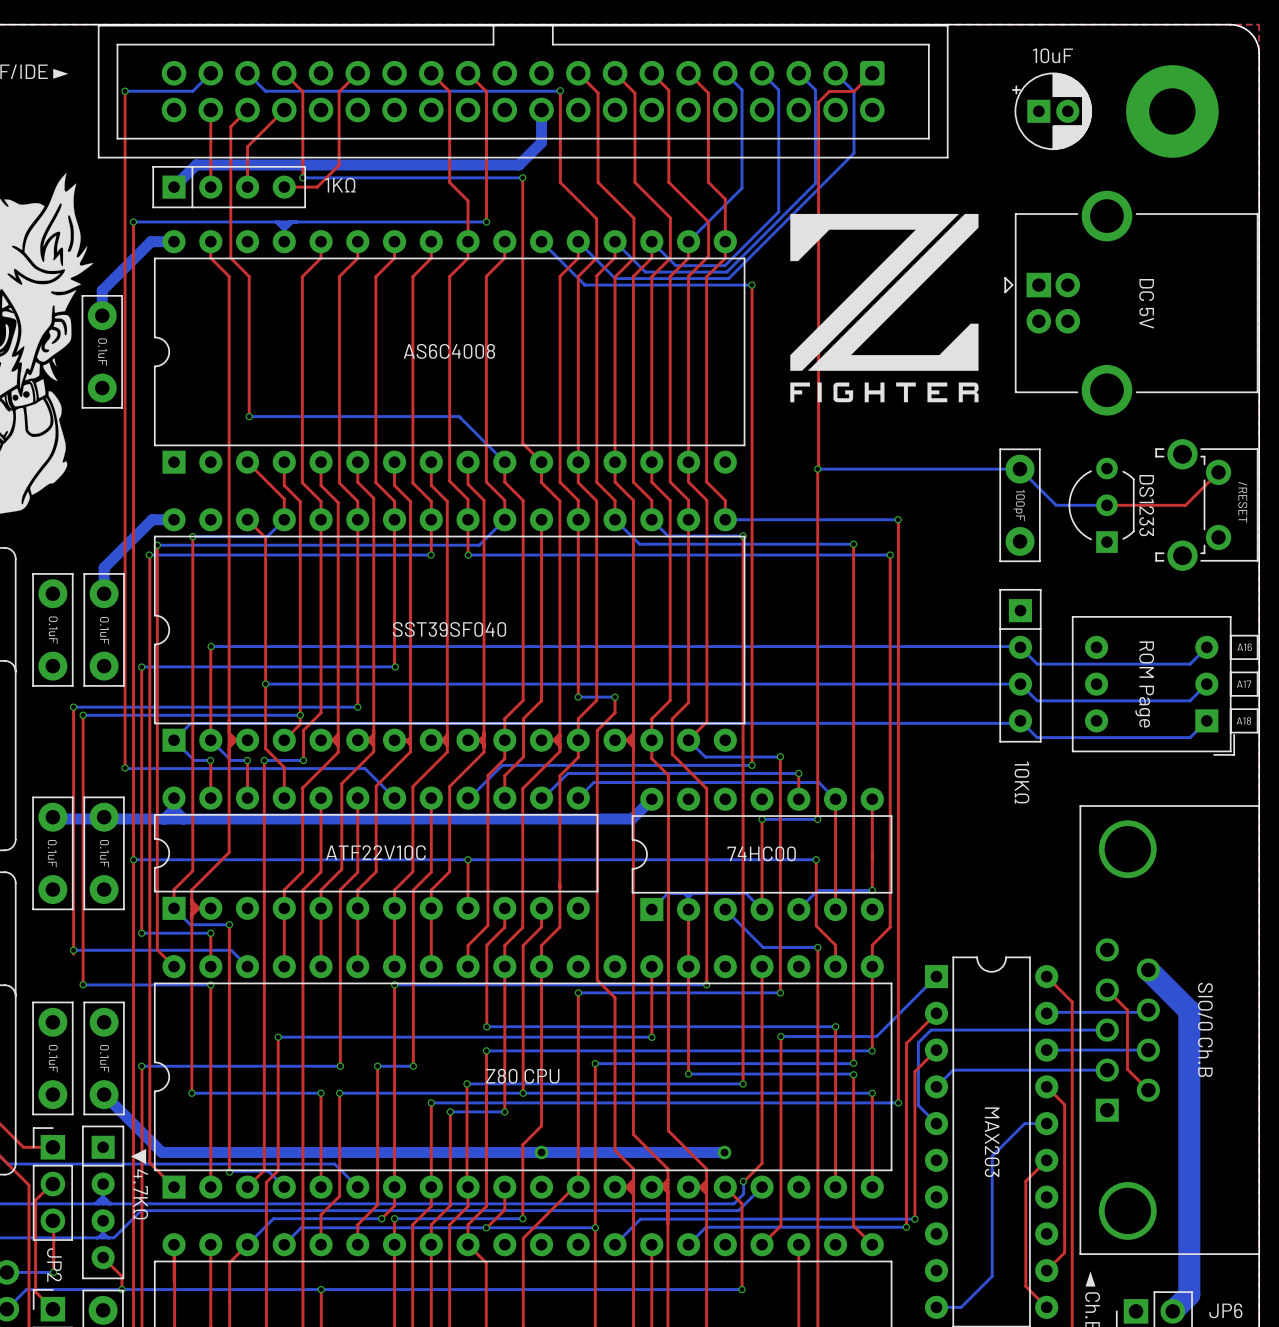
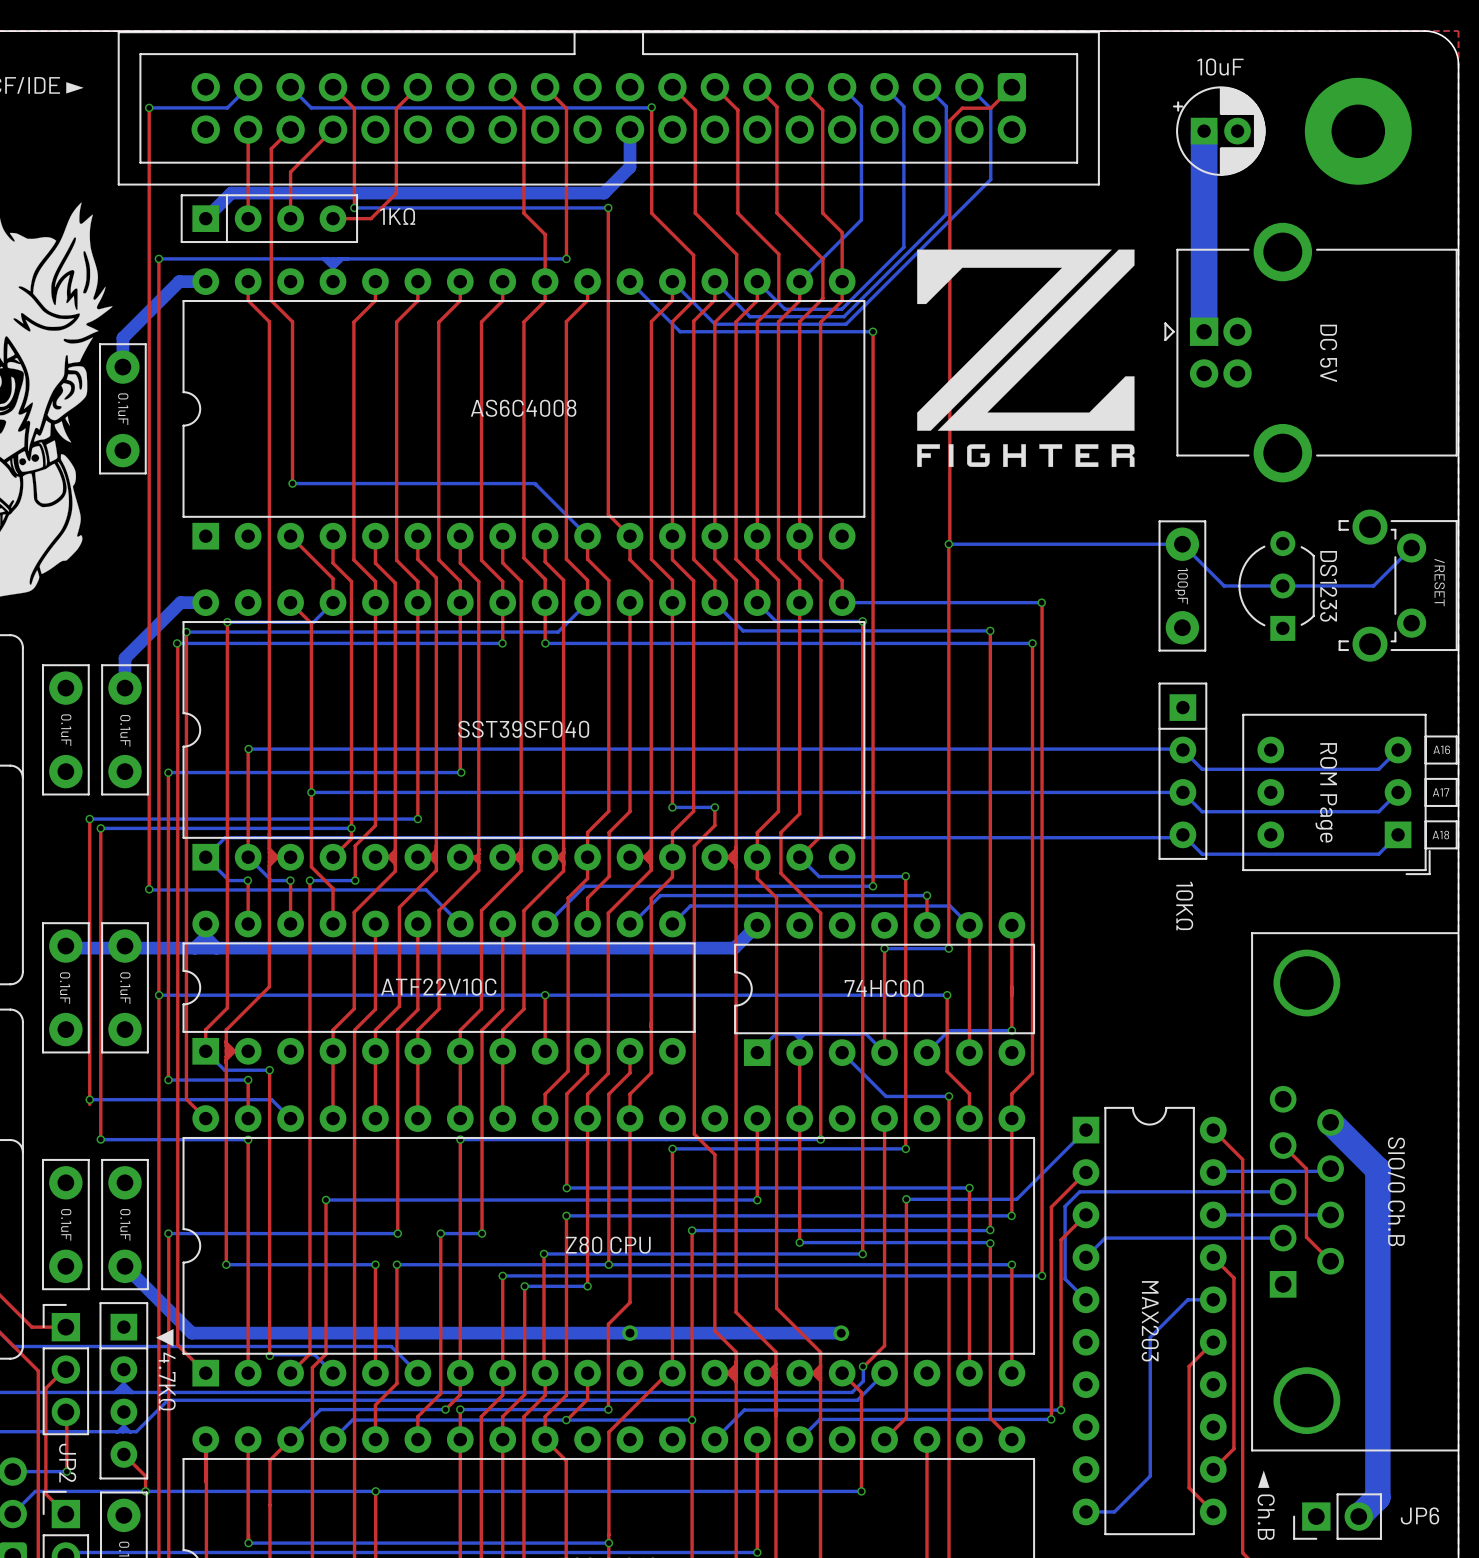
bottom track: none -> (1204, 131) (1204, 331)
top track: (1218, 472) (1185, 505) (1112, 505) -> none
bottom track: none -> (1411, 547) (1373, 585) (1288, 585)

